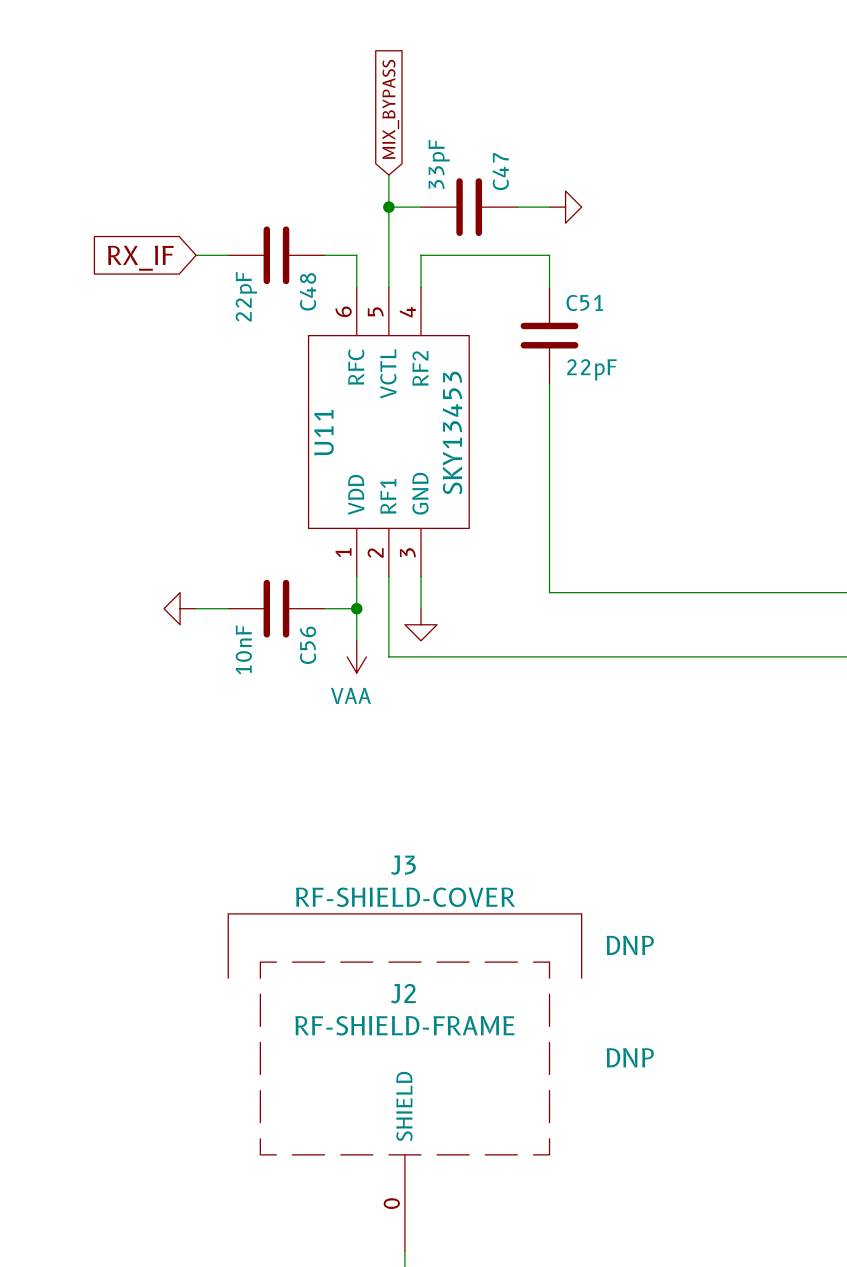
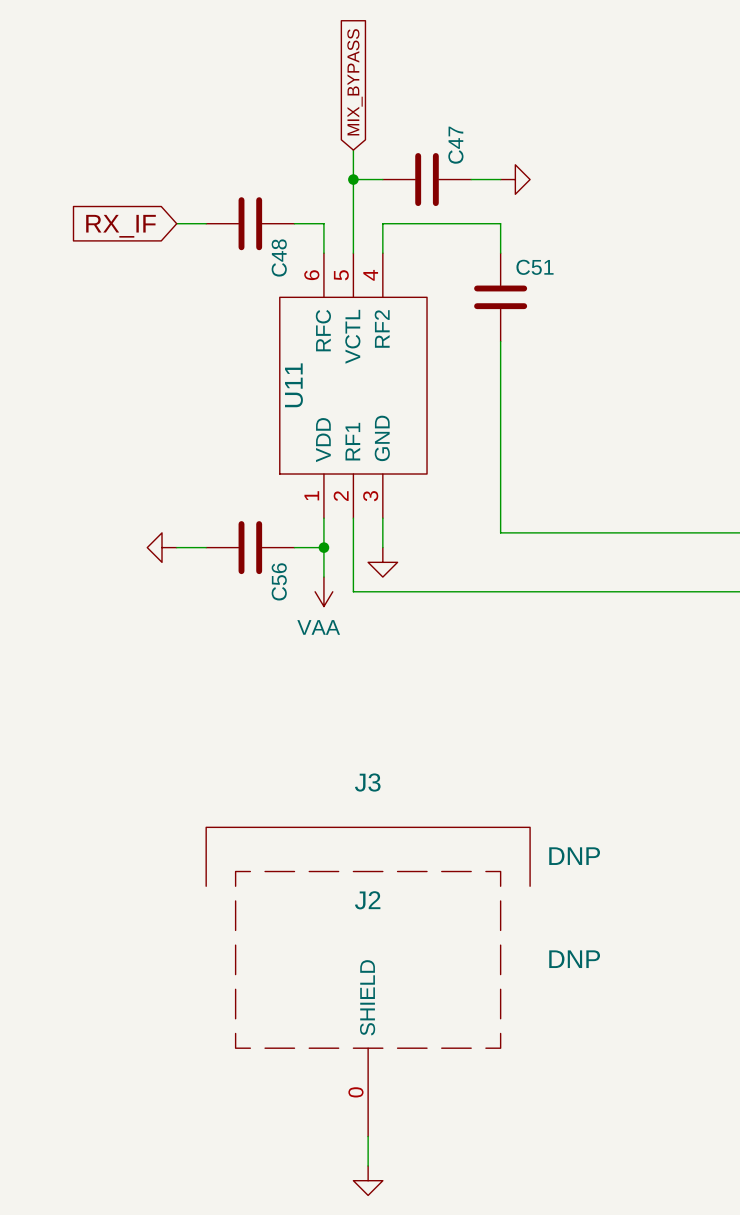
C47 value: 33pF (439, 164) -> none
C48 value: 22pF (246, 296) -> none
C51 value: 22pF (591, 369) -> none
U11 value: SKY13453 (452, 433) -> none
C56 value: 10nF (243, 649) -> none
J3 value: RF-SHIELD-COVER (405, 897) -> none
J2 value: RF-SHIELD-FRAME (404, 1025) -> none

